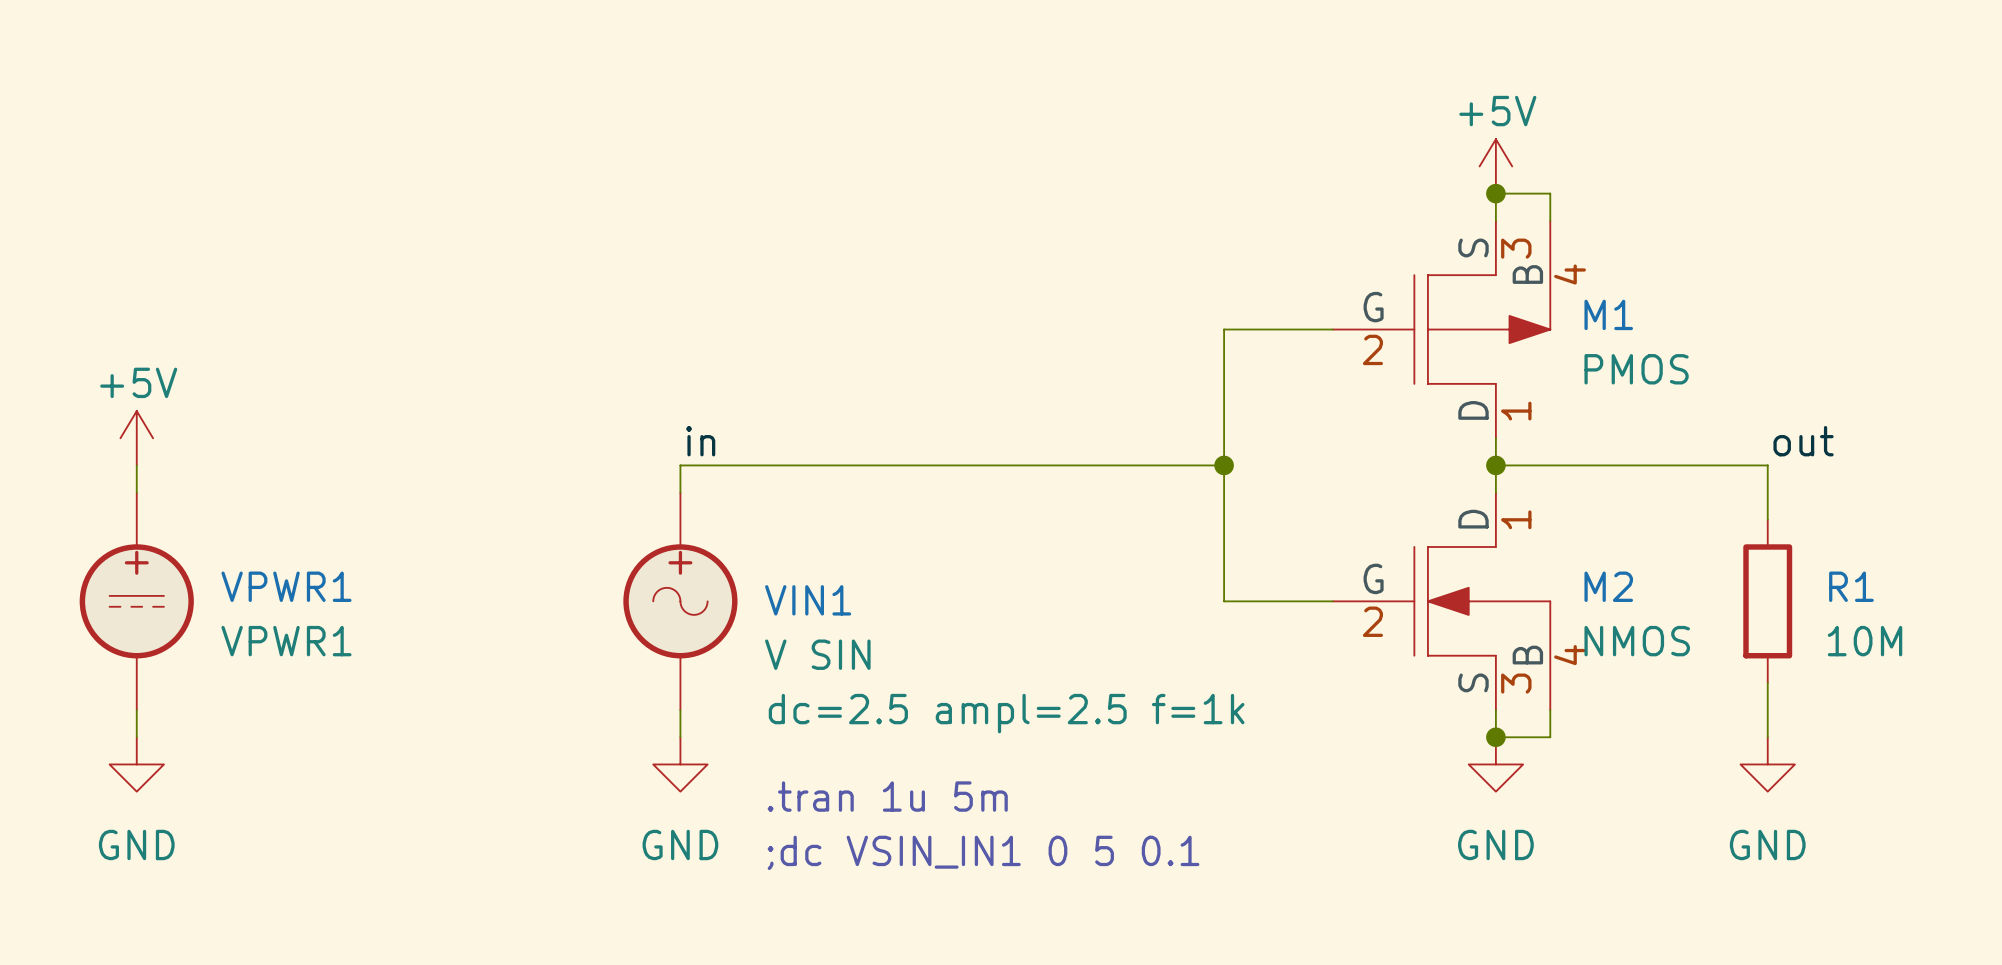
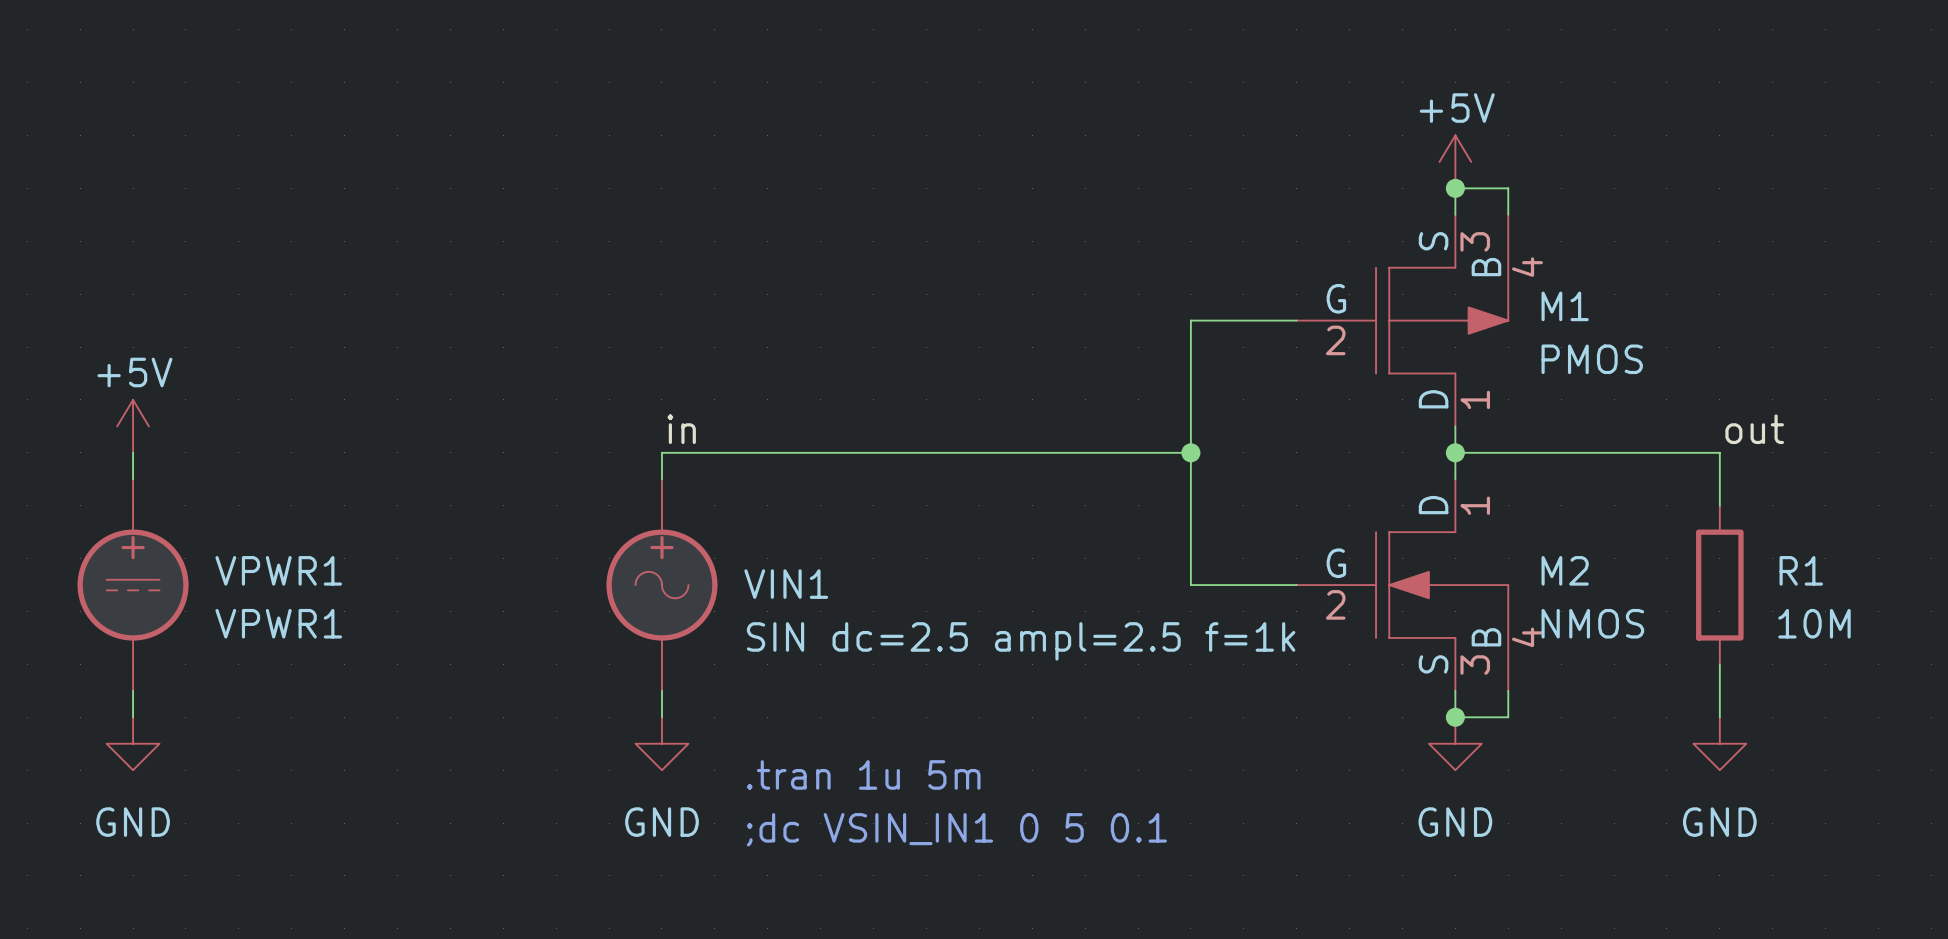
VIN1 value: V SIN (817, 654) -> SIN dc=2.5 ampl=2.5 f=1k (1021, 641)
VIN1 text: dc=2.5 ampl=2.5 f=1k (1006, 713) -> none

